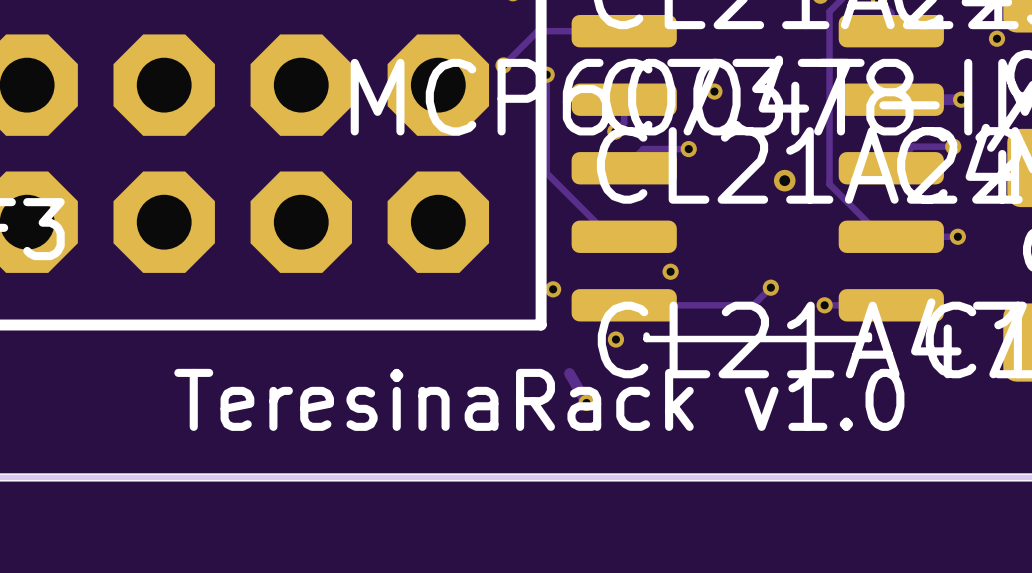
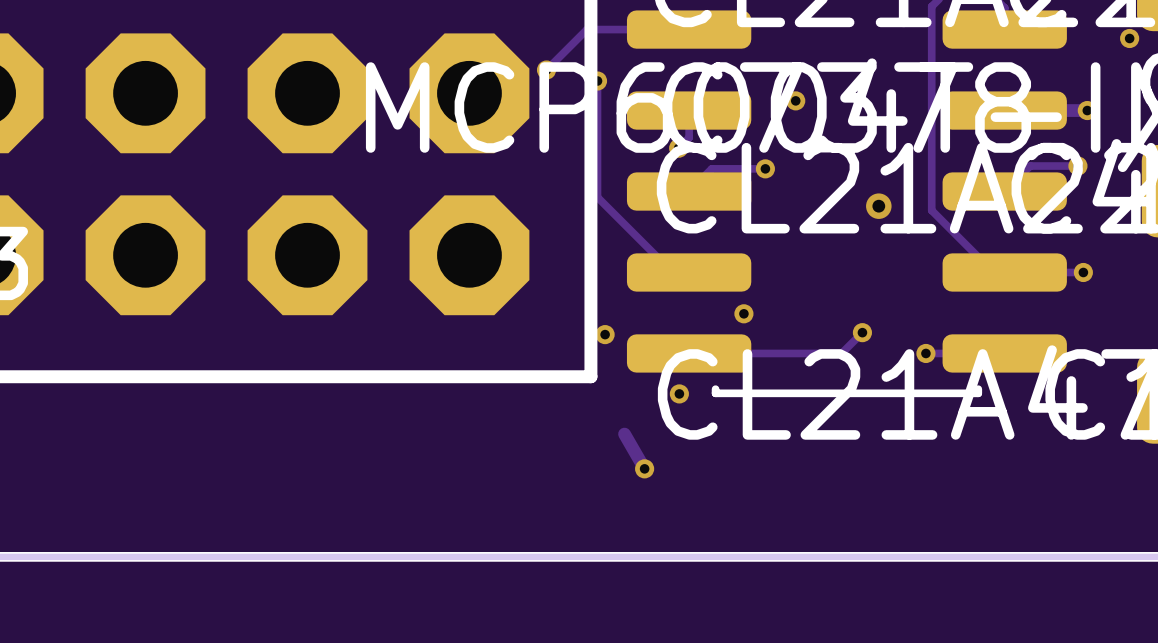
text: TeresinaRack v1.0 (539, 399) -> none

